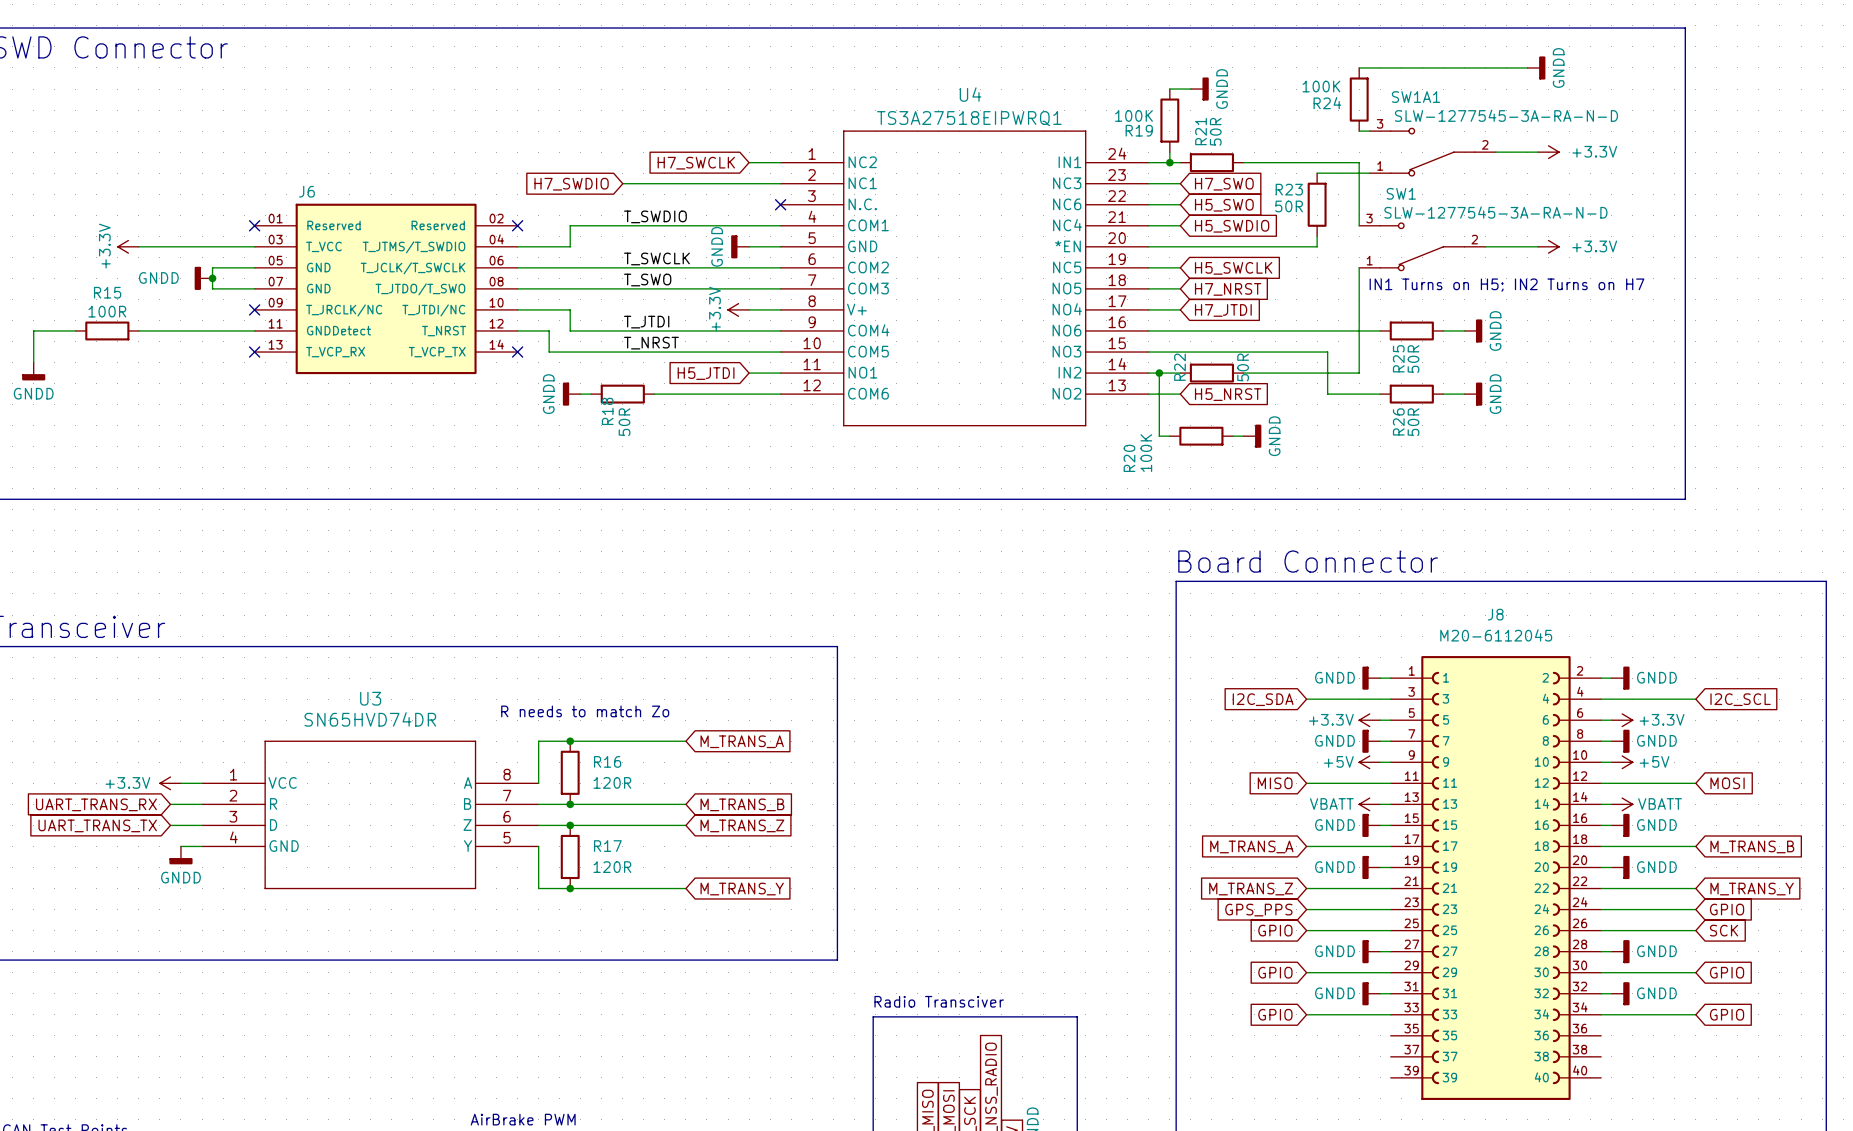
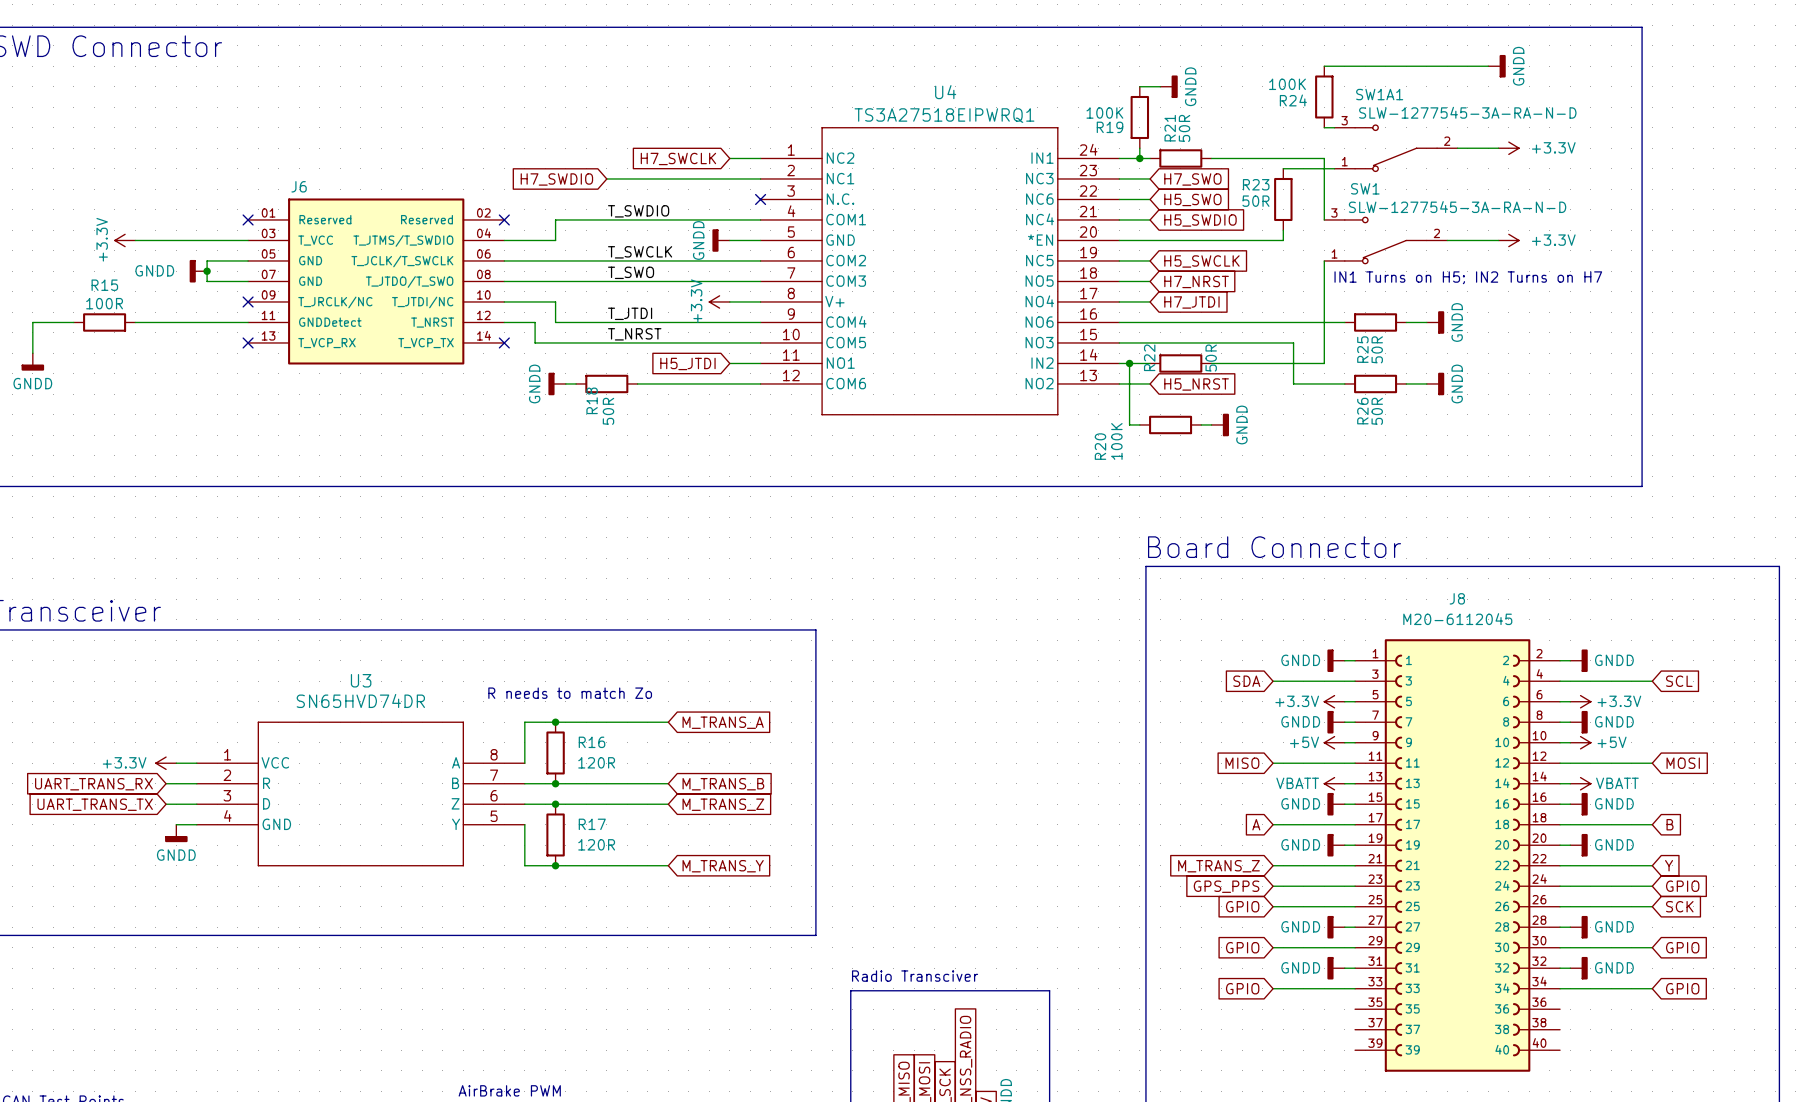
global label: I2C_SDA (1263, 699) -> SDA (1246, 681)
global label: I2C_SCL (1740, 699) -> SCL (1679, 681)
global label: M_TRANS_A (1251, 846) -> A (1256, 824)
global label: M_TRANS_B (1752, 846) -> B (1670, 824)
global label: M_TRANS_Y (1752, 889) -> Y (1669, 865)

